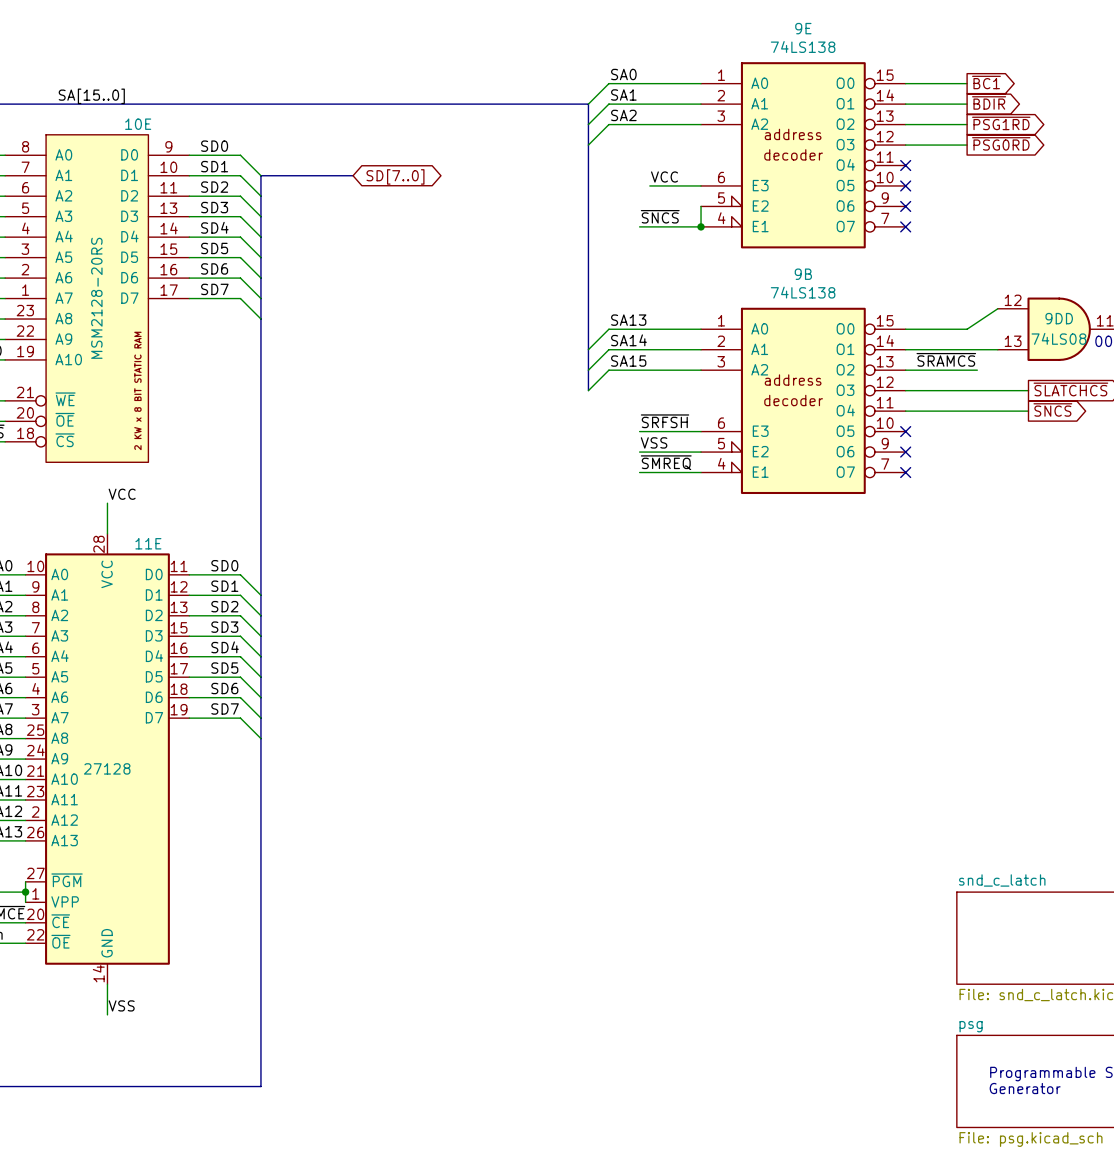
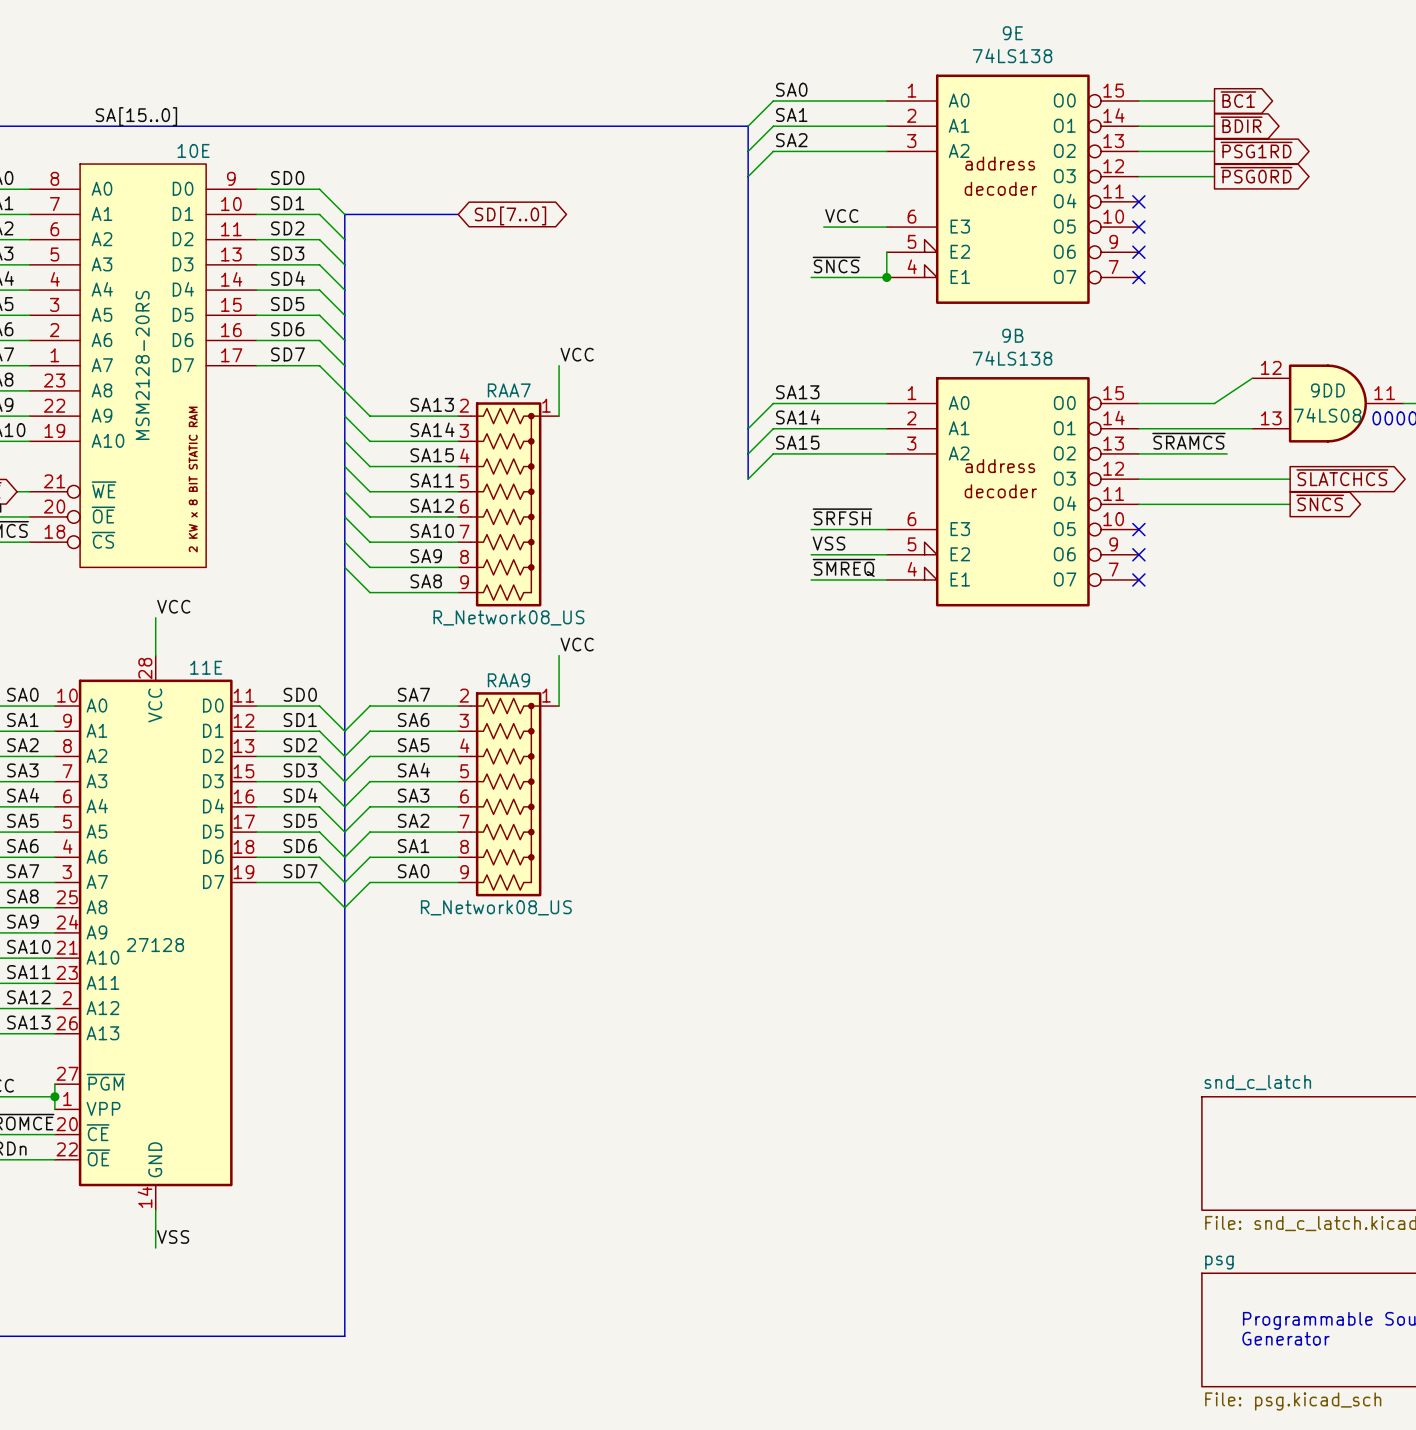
label: none -> VCC (577, 354)
wire: none -> (559, 365) (559, 416)
wire: none -> (344, 390) (370, 416) (458, 416)
label: none -> SA13 (432, 404)
wire: none -> (344, 416) (370, 441) (458, 441)
label: none -> SA14 (432, 429)
wire: none -> (344, 441) (370, 466) (458, 466)
label: none -> SA15 (432, 455)
wire: none -> (344, 466) (370, 491) (458, 491)
label: none -> SA11 (432, 480)
wire: none -> (344, 491) (370, 516) (458, 516)
RAA7: none -> R_Network08_US (508, 504)
label: none -> SA12 (432, 505)
wire: none -> (344, 516) (370, 542) (458, 542)
label: none -> SA10 (432, 530)
wire: none -> (344, 542) (370, 567) (458, 567)
label: none -> SA9 (426, 556)
wire: none -> (344, 567) (370, 592) (458, 592)
label: none -> SA8 (426, 581)
label: none -> VCC (577, 644)
wire: none -> (559, 655) (559, 706)
label: none -> SA7 (413, 694)
wire: none -> (458, 706) (370, 706) (344, 731)
label: none -> SA6 (413, 719)
wire: none -> (458, 731) (370, 731) (344, 756)
label: none -> SA5 (413, 745)
wire: none -> (458, 756) (370, 756) (344, 781)
label: none -> SA4 (413, 770)
wire: none -> (458, 781) (370, 781) (344, 806)
RAA9: none -> R_Network08_US (508, 794)
label: none -> SA3 (413, 795)
wire: none -> (458, 806) (370, 806) (344, 832)
label: none -> SA2 (413, 820)
wire: none -> (458, 832) (370, 832) (344, 857)
label: none -> SA1 (413, 846)
wire: none -> (458, 857) (370, 857) (344, 882)
label: none -> SA0 (413, 871)
wire: none -> (458, 882) (370, 882) (344, 907)

